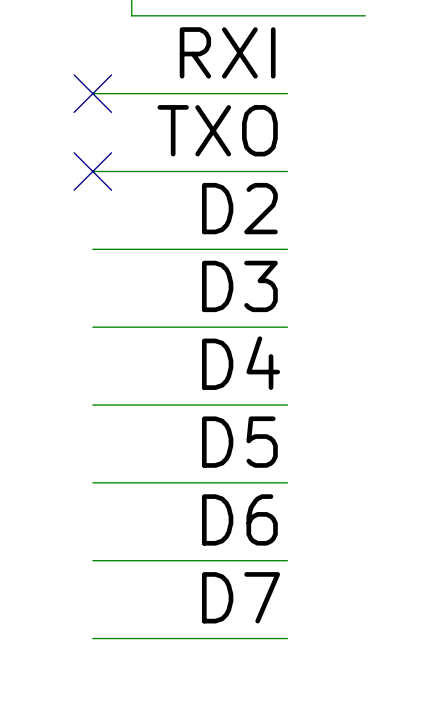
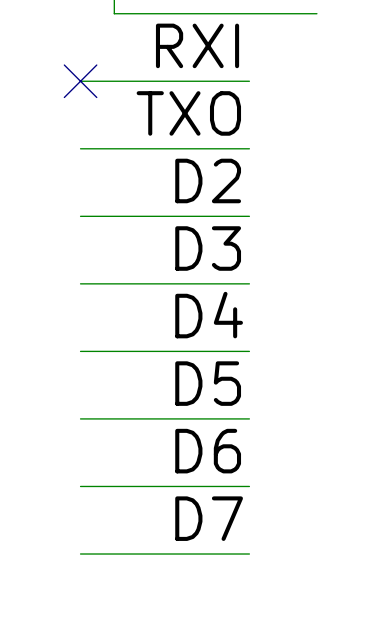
no-connect mark: (92, 171) -> none

